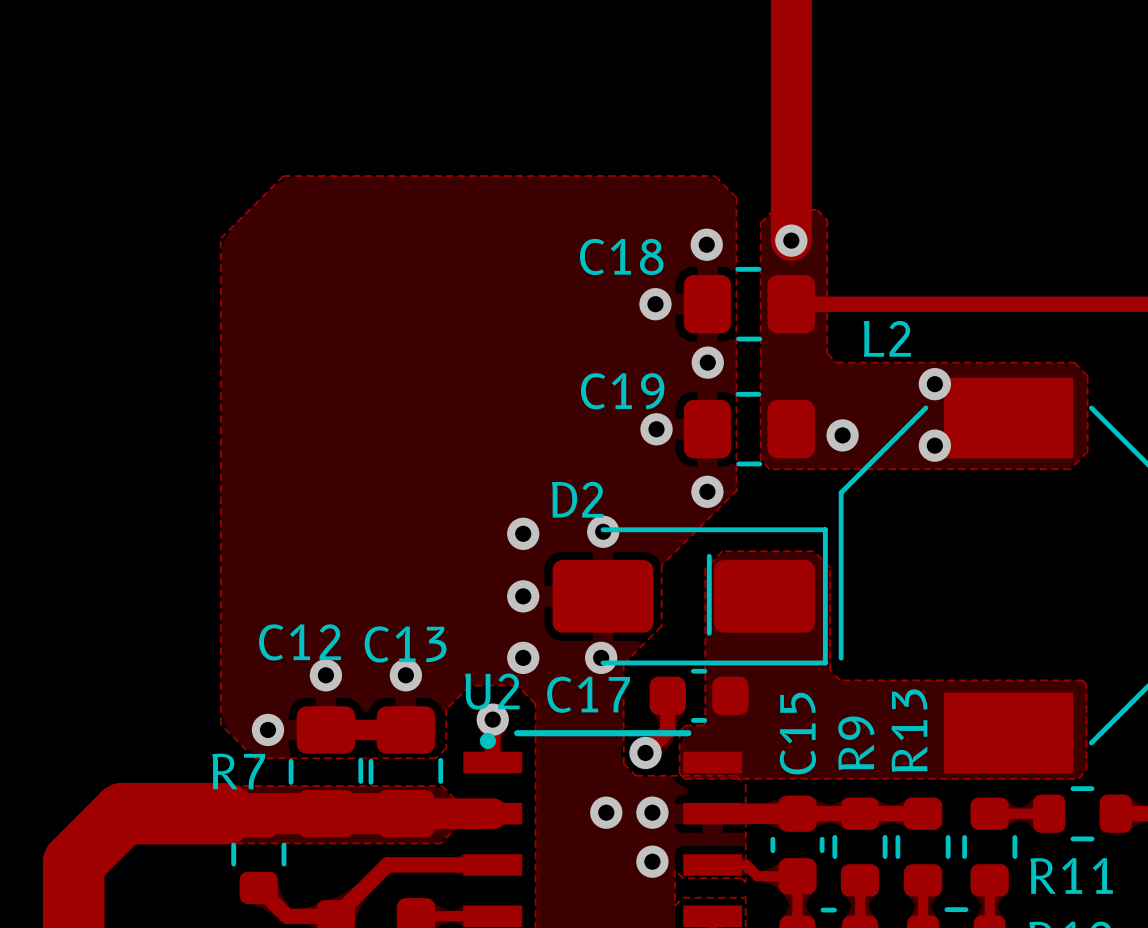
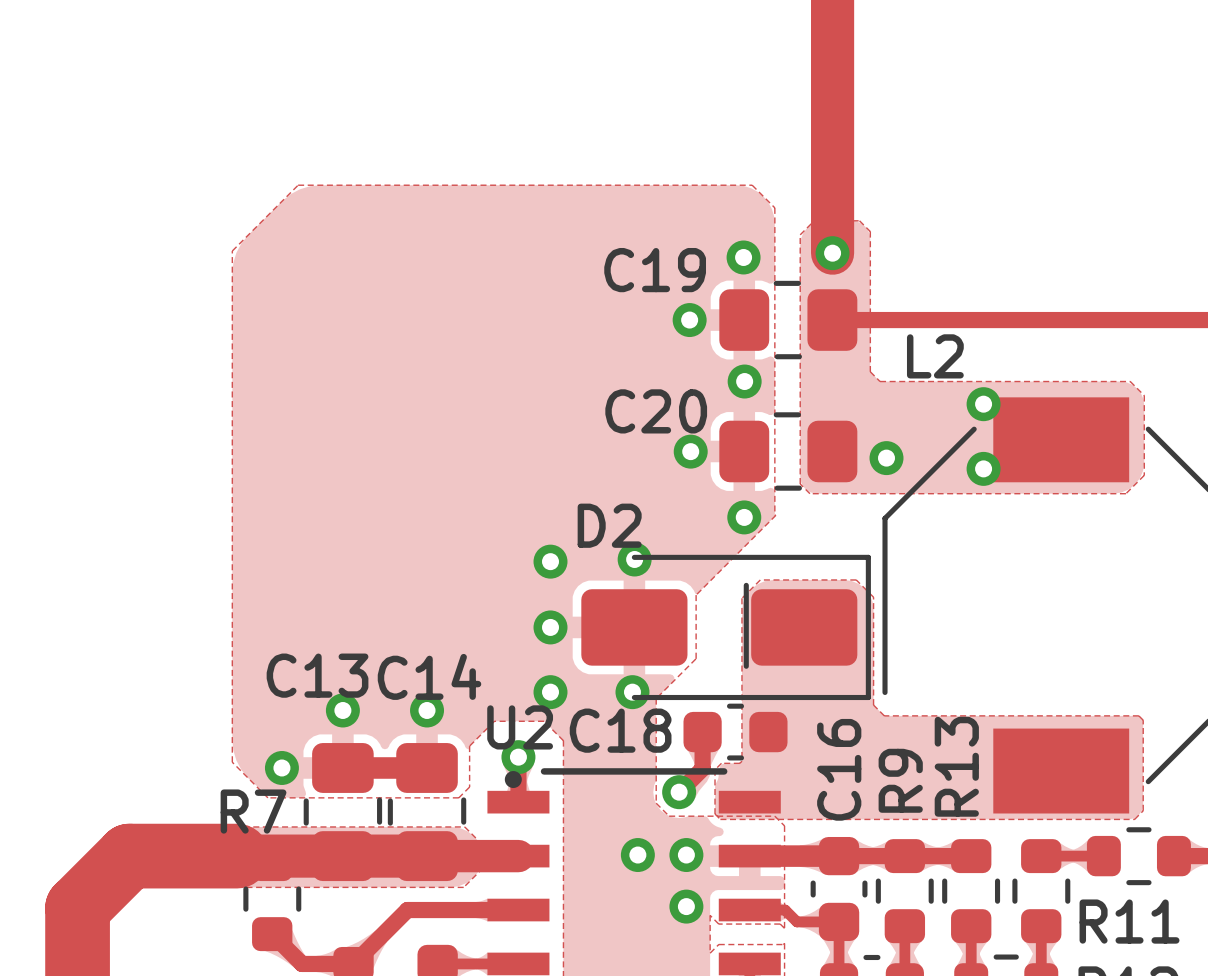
C18 name: C18 (621, 256) -> C19 (655, 270)
C19 name: C19 (622, 391) -> C20 (656, 411)
C12 name: C12 (299, 642) -> C13 (317, 675)
C13 name: C13 (405, 644) -> C14 (429, 676)
C17 name: C17 (588, 694) -> C18 (620, 730)
C15 name: C15 (797, 733) -> C16 (839, 769)

